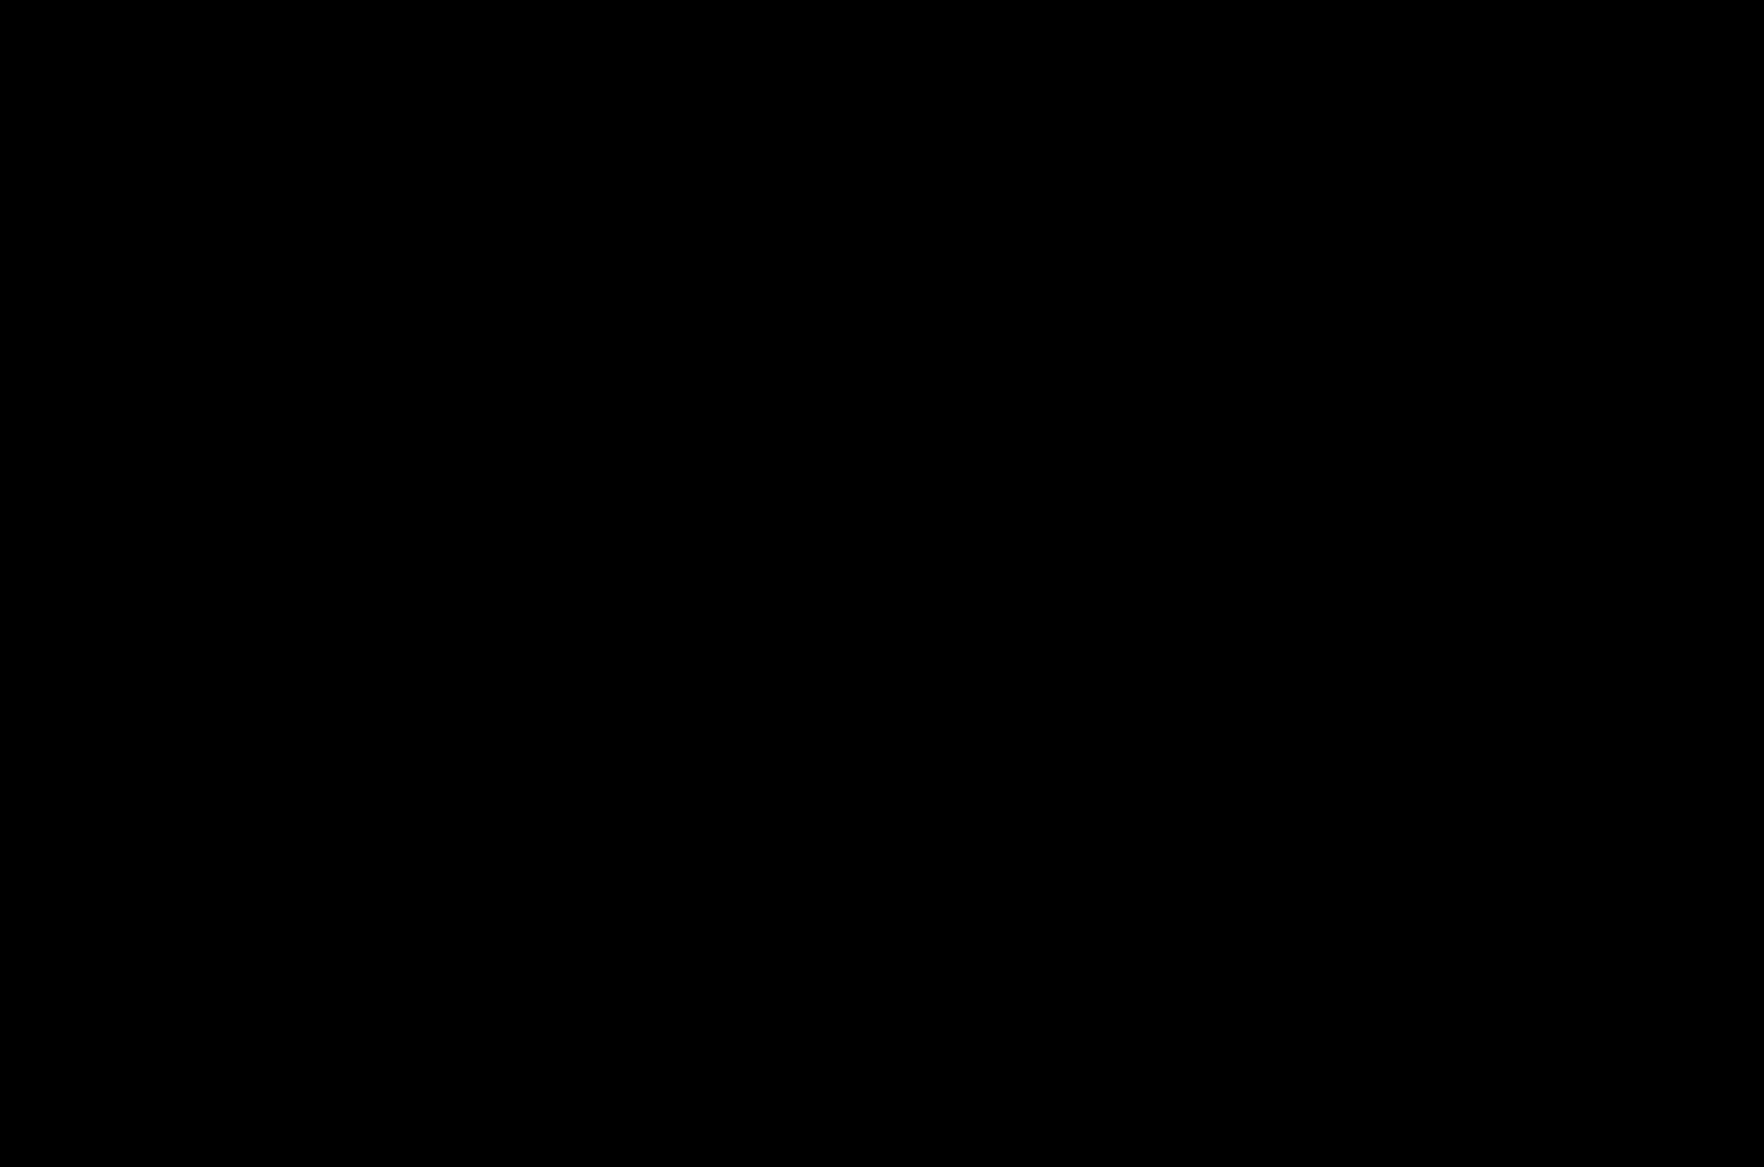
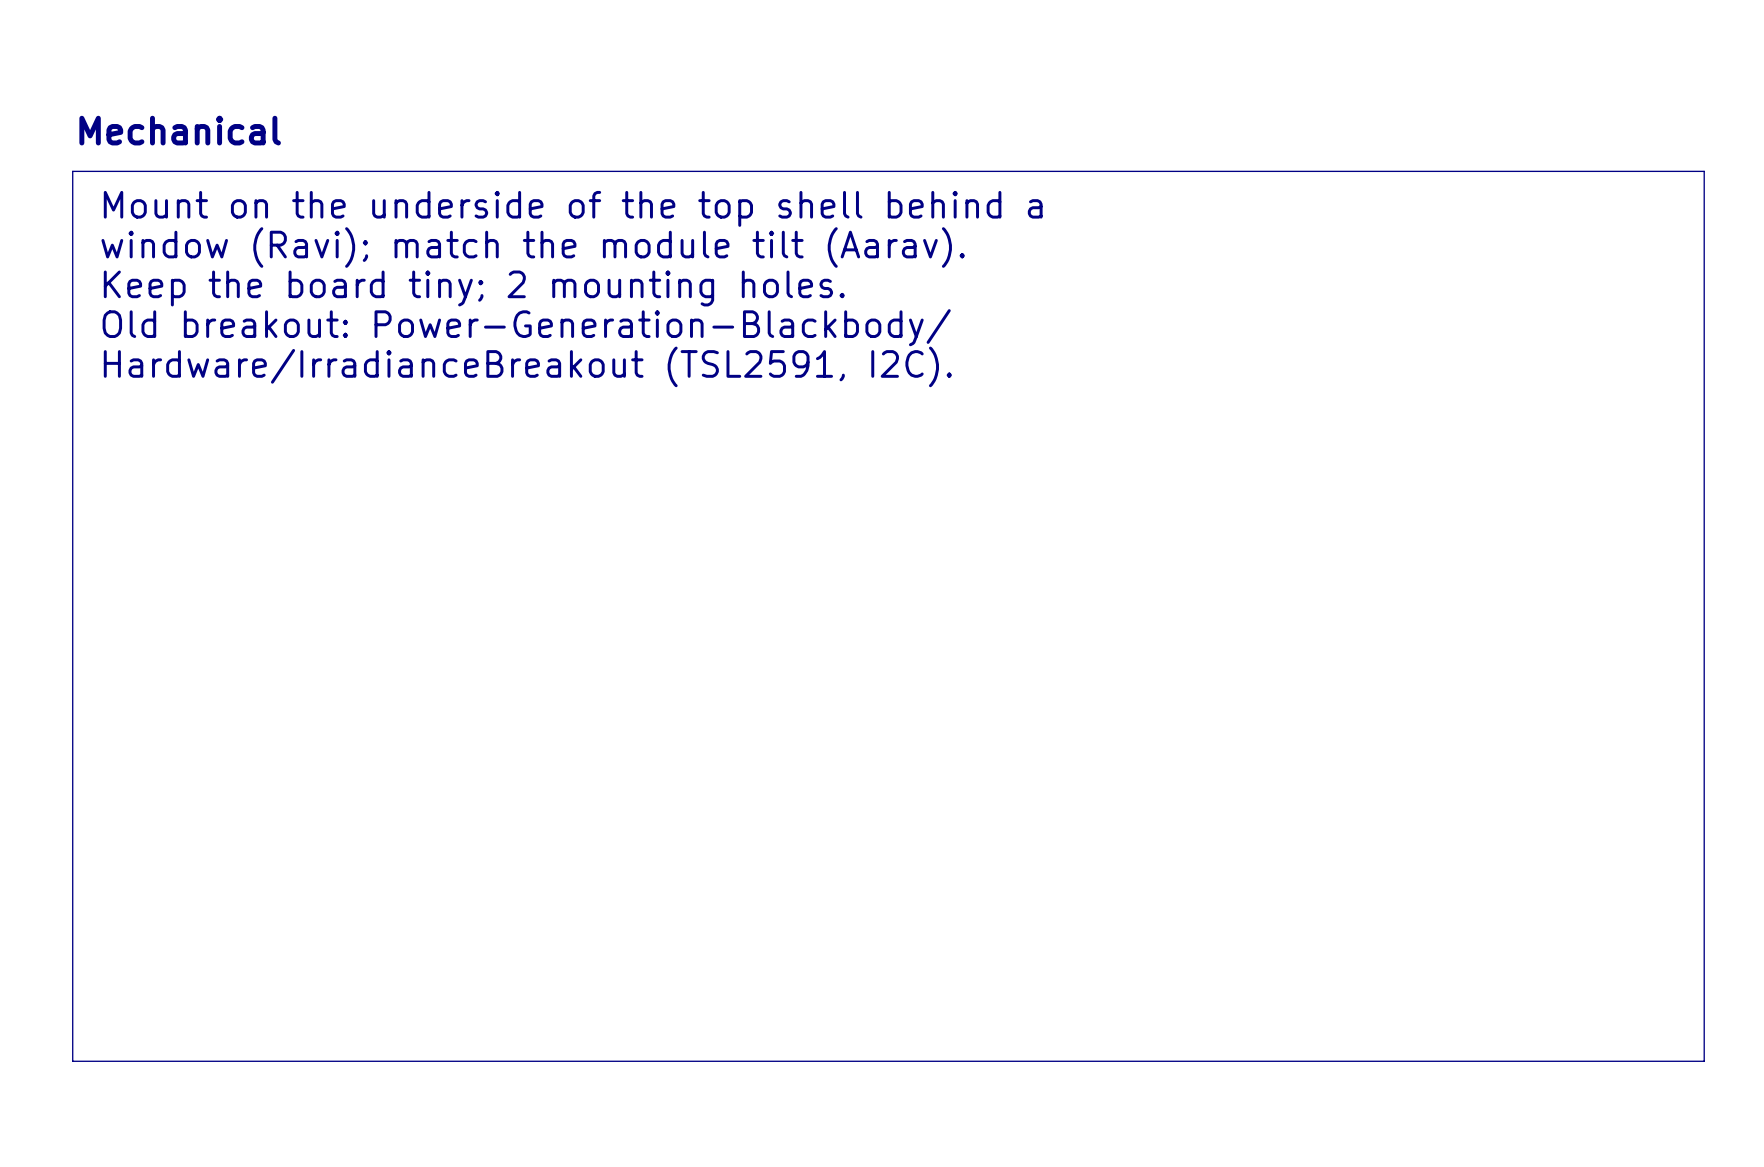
text: none -> Mechanical (180, 130)
line: none -> (72, 171) (1704, 171) (1704, 1061) (72, 1061) (72, 171)
text: none -> Mount on the underside of the top shell behind a (573, 208)
text: none -> window (Ravi); match the module tilt (Aarav). (533, 247)
text: none -> Keep the board tiny; 2 mounting holes. (474, 288)
text: none -> Old breakout: Power-Generation-Blackbody/ (526, 327)
text: none -> Hardware/IrradianceBreakout (TSL2591, I2C). (527, 366)

